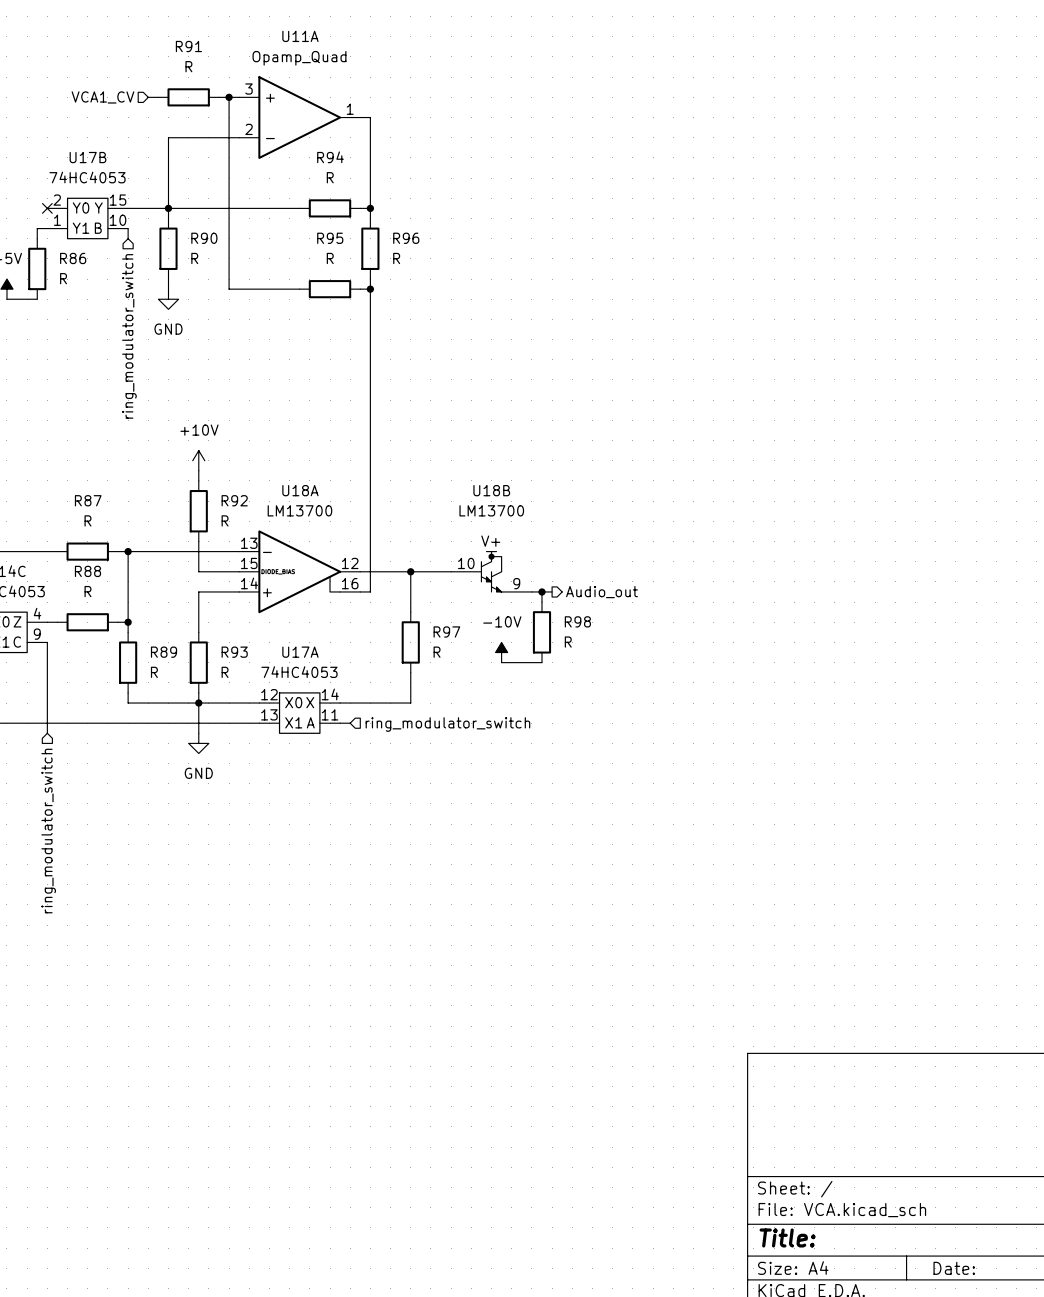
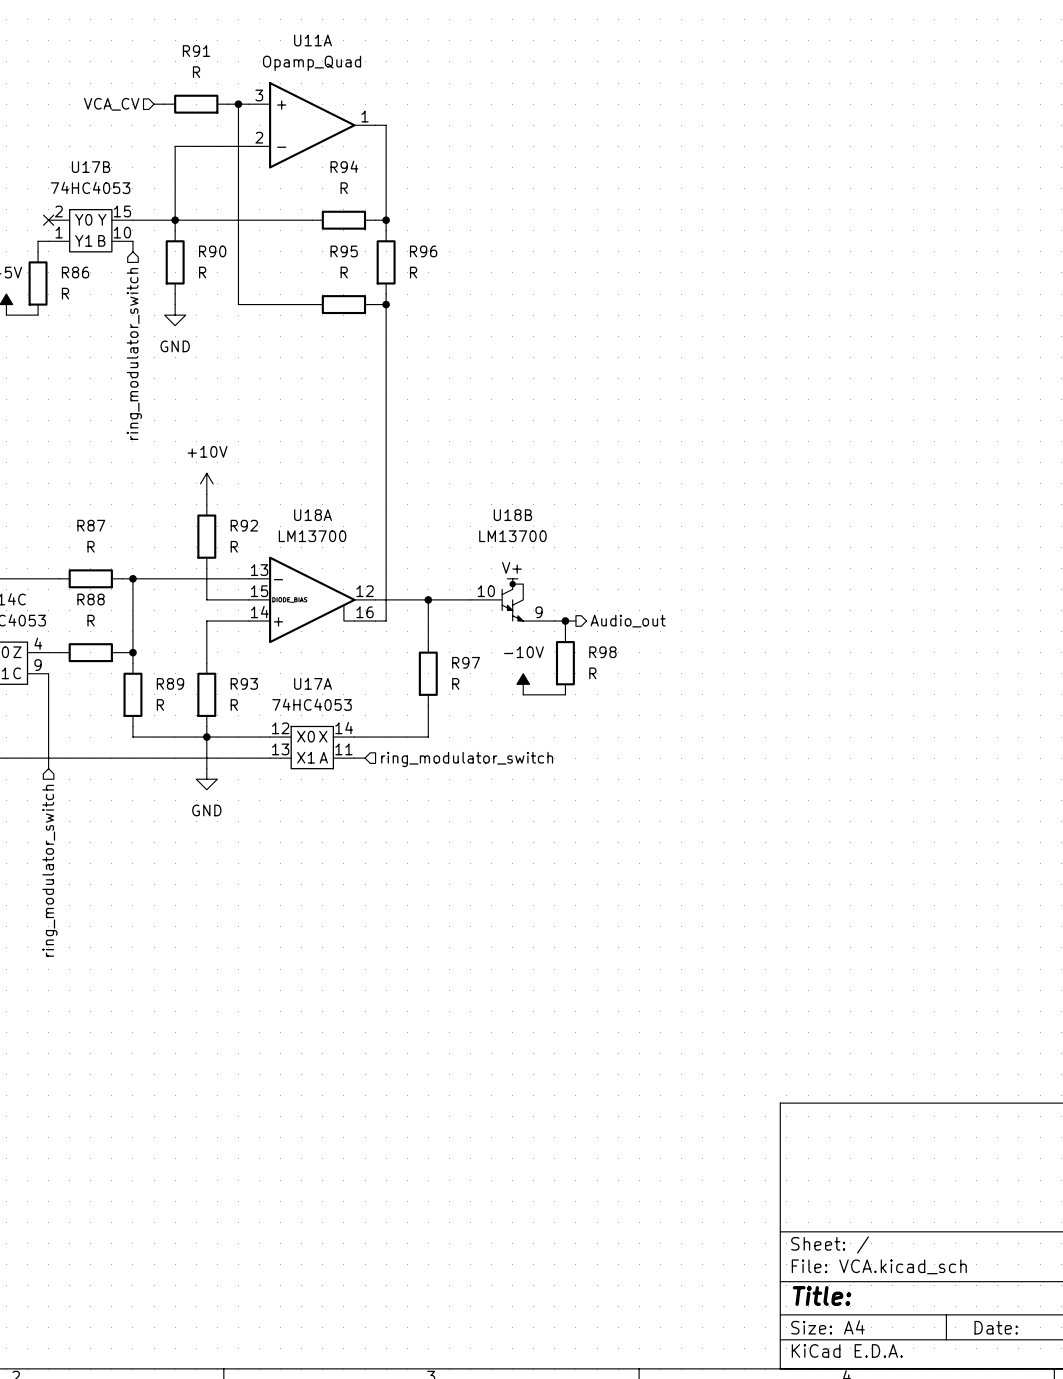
hierarchical label: VCA1_CV (102, 97) -> VCA_CV (111, 104)

